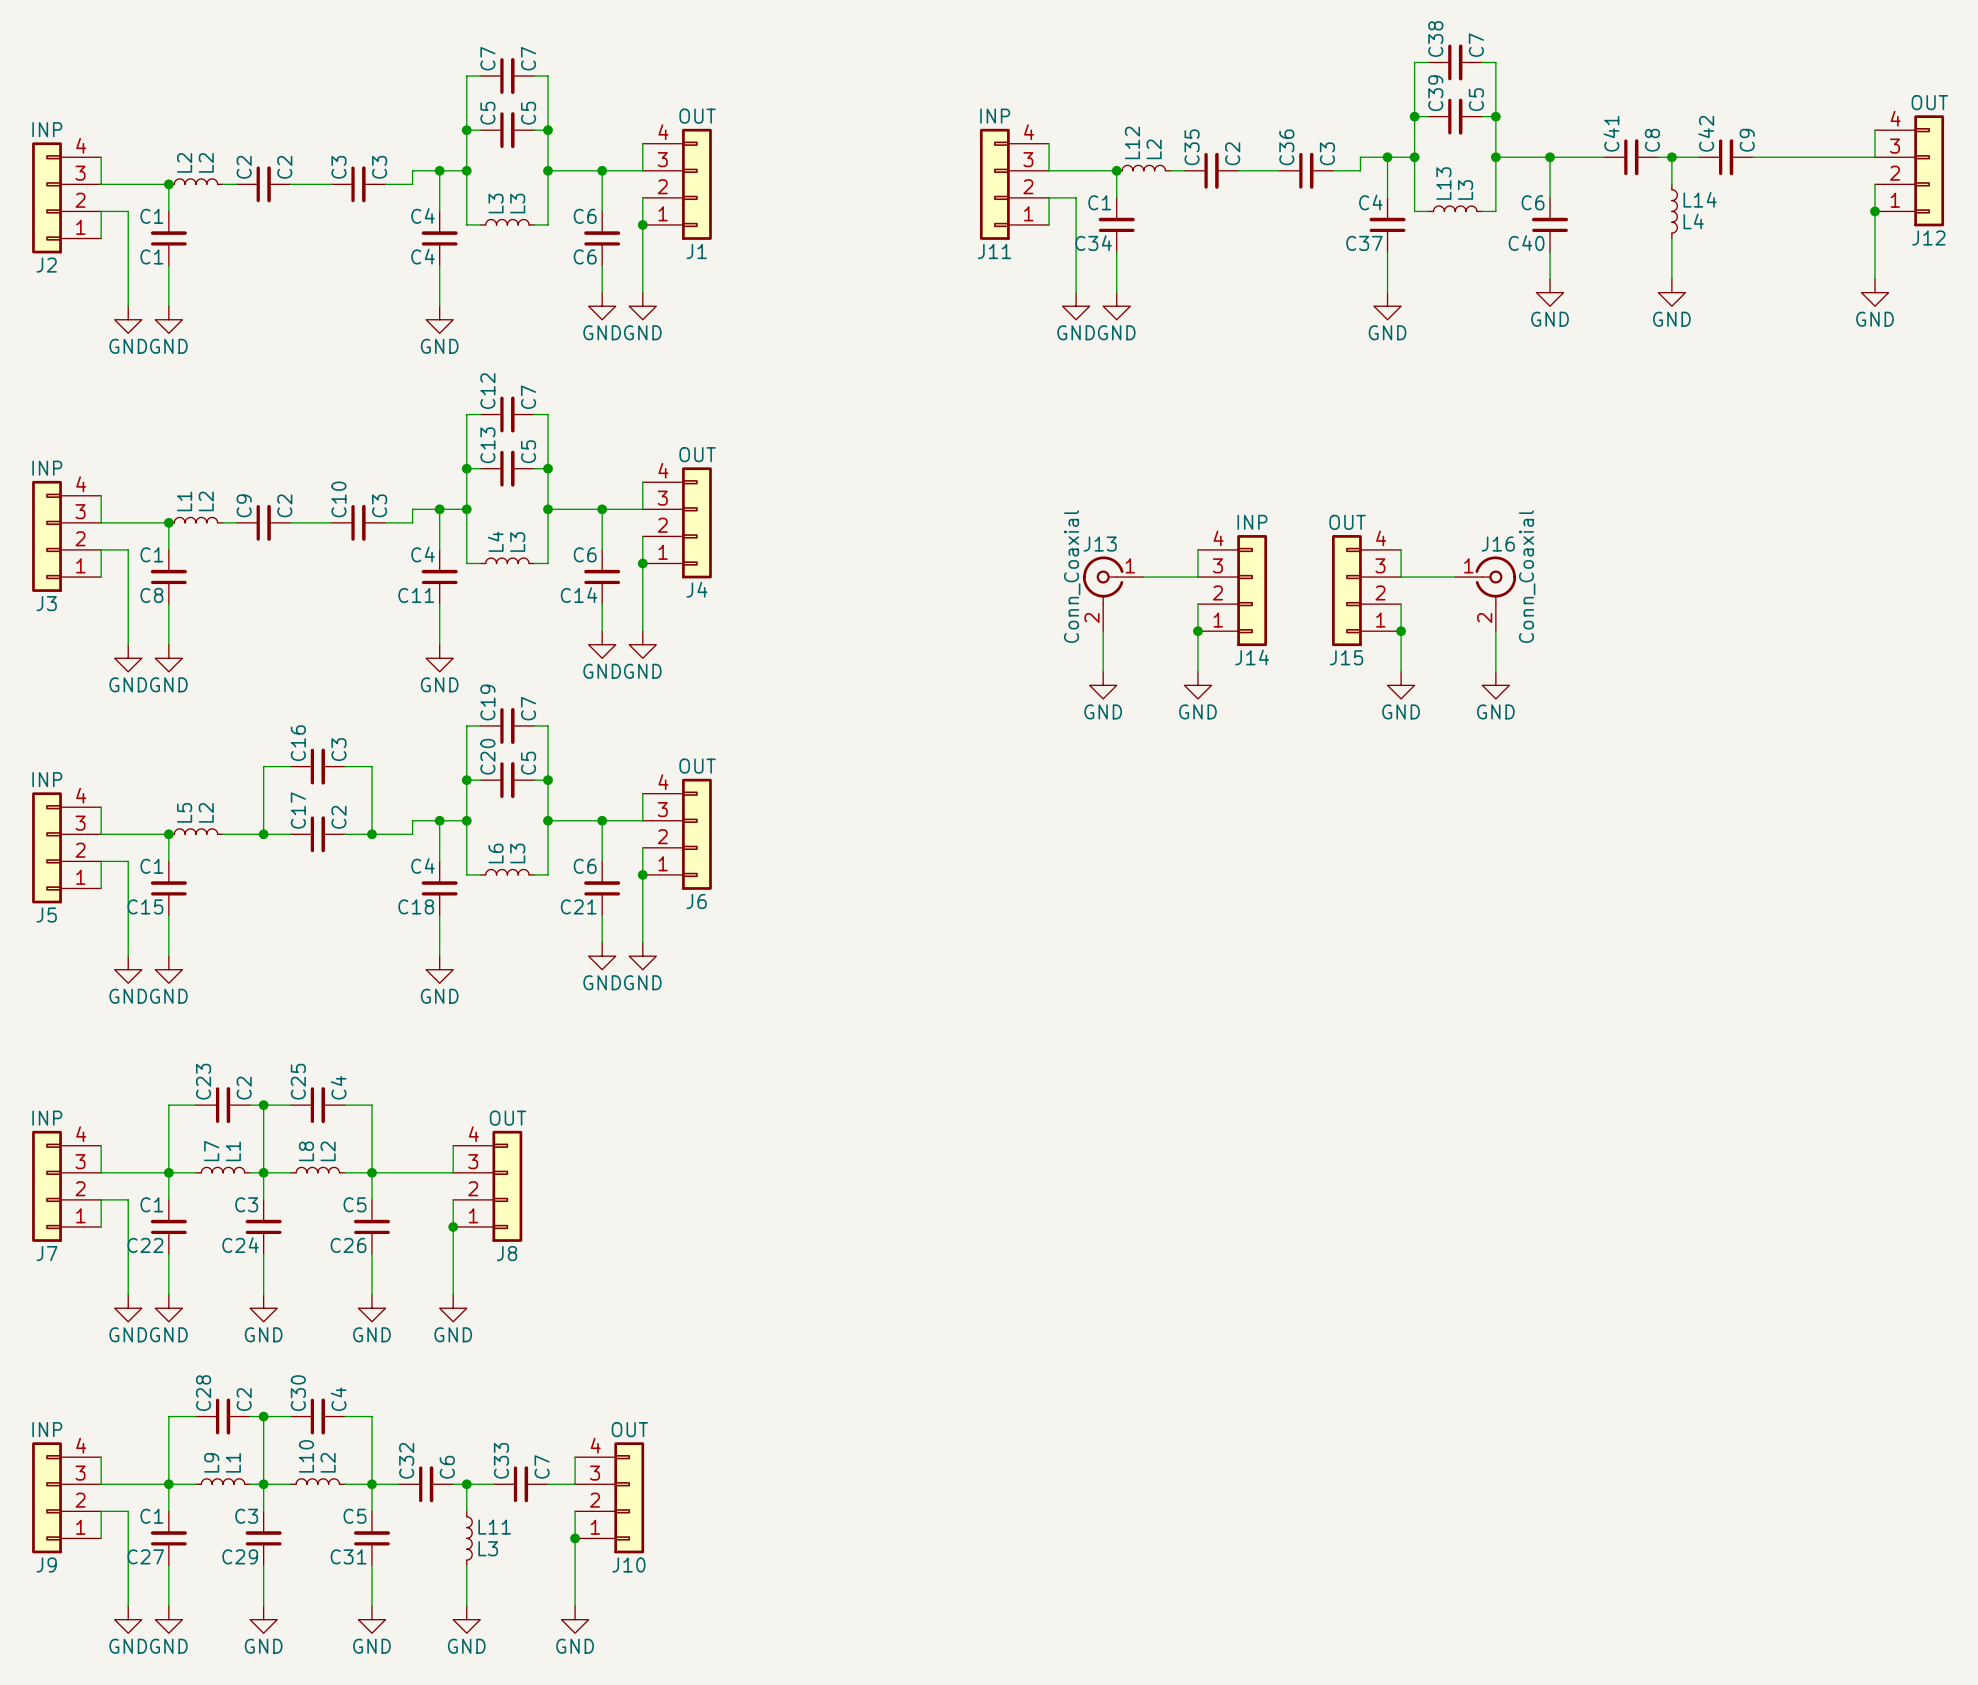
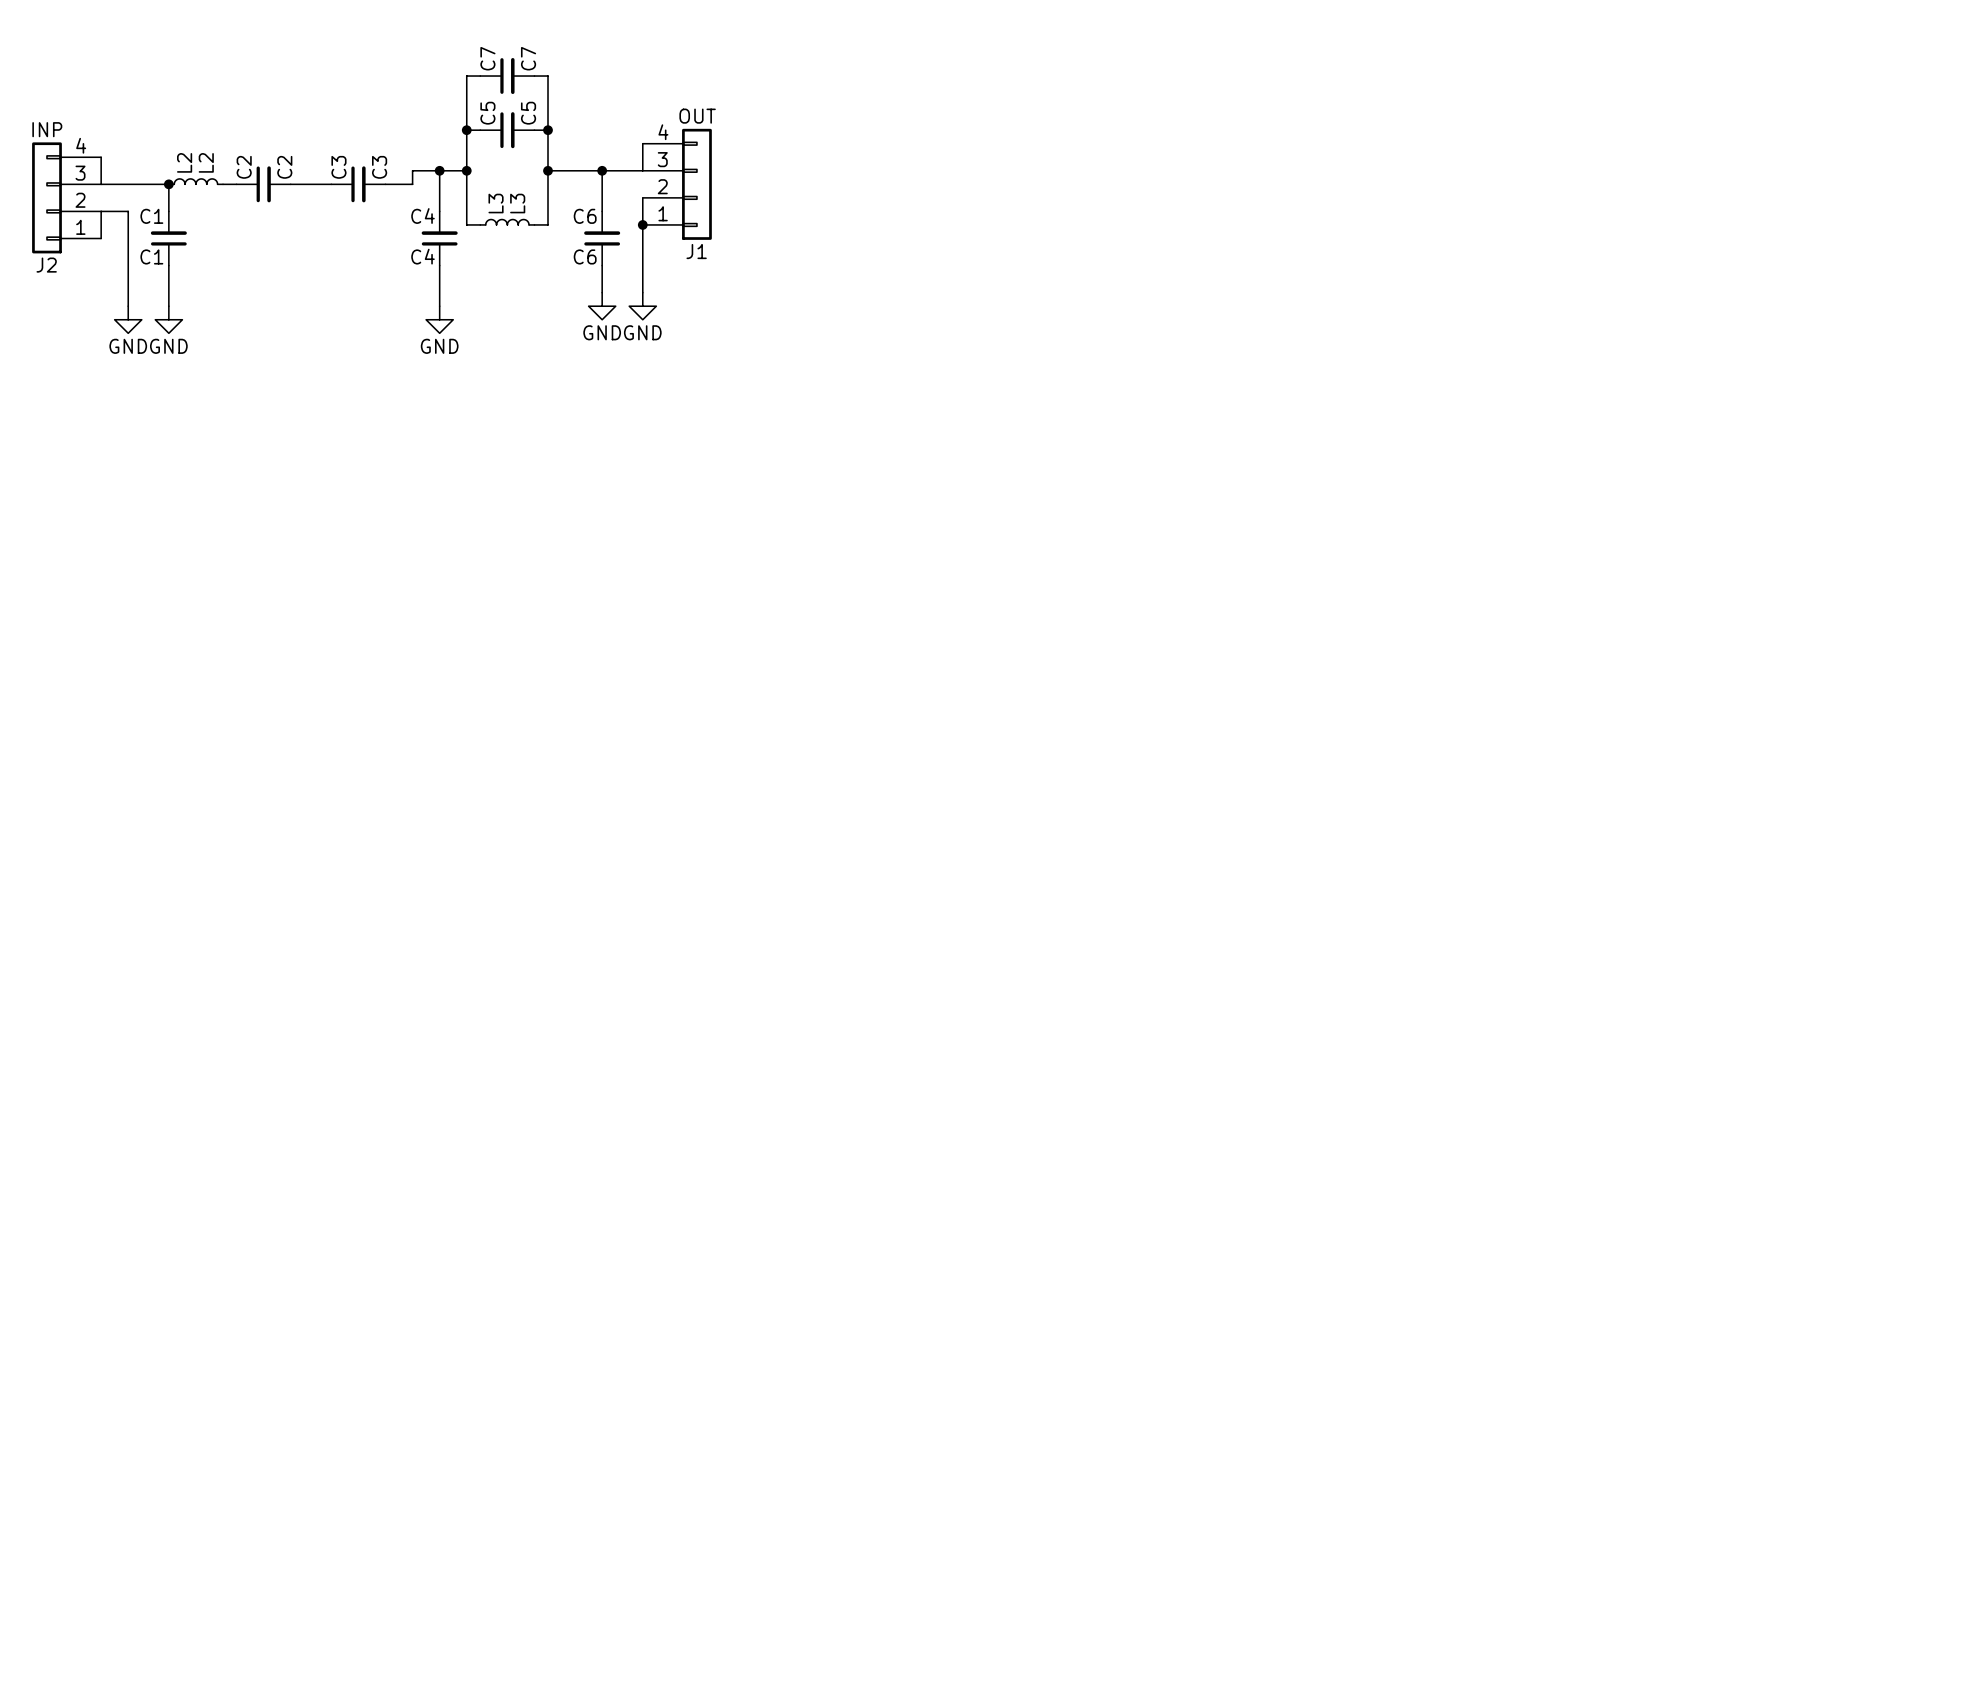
wire: (1428, 62) (1414, 62) (1414, 211) (1428, 211) -> none
C38: C7 (1455, 62) -> none
wire: (1482, 62) (1495, 62) (1495, 211) (1482, 211) -> none
wire: (1414, 116) (1428, 116) -> none
junction: (1414, 116) -> none
C39: C5 (1455, 116) -> none
wire: (1482, 116) (1495, 116) -> none
junction: (1495, 116) -> none
wire: (1875, 130) (1875, 157) (1753, 157) -> none
wire: (1049, 143) (1049, 170) (1116, 170) (1116, 197) -> none
wire: (1387, 157) (1387, 197) -> none
junction: (1387, 157) -> none
wire: (1414, 157) (1360, 157) (1360, 170) (1333, 170) -> none
junction: (1414, 157) -> none
wire: (1495, 157) (1604, 157) -> none
junction: (1495, 157) -> none
wire: (1550, 157) (1550, 197) -> none
junction: (1550, 157) -> none
C41: C8 (1631, 157) -> none
wire: (1658, 157) (1698, 157) -> none
wire: (1671, 157) (1671, 184) -> none
junction: (1671, 157) -> none
C42: C9 (1726, 157) -> none
L12: L2 (1143, 168) -> none
junction: (1116, 170) -> none
wire: (1170, 170) (1184, 170) -> none
C35: C2 (1211, 170) -> none
wire: (1238, 170) (1279, 170) -> none
C36: C3 (1306, 170) -> none
J12: OUT (1909, 170) -> none
J11: INP (1014, 184) -> none
wire: (1875, 184) (1875, 279) -> none
L13: L3 (1455, 208) -> none
L14: L4 (1674, 211) -> none
junction: (1875, 211) -> none
wire: (1049, 224) (1049, 197) (1076, 197) (1076, 292) -> none
C34: C1 (1116, 224) -> none
C37: C4 (1387, 224) -> none
C40: C6 (1550, 224) -> none
wire: (1671, 238) (1671, 279) -> none
wire: (1116, 252) (1116, 292) -> none
wire: (1387, 252) (1387, 292) -> none
wire: (1550, 252) (1550, 279) -> none
power symbol: GND (1550, 292) -> none
power symbol: GND (1671, 292) -> none
power symbol: GND (1875, 292) -> none
power symbol: GND (1076, 306) -> none
power symbol: GND (1116, 306) -> none
power symbol: GND (1387, 306) -> none
wire: (480, 414) (466, 414) (466, 563) (480, 563) -> none
C12: C7 (507, 414) -> none
wire: (534, 414) (548, 414) (548, 563) (534, 563) -> none
wire: (466, 468) (480, 468) -> none
junction: (466, 468) -> none
C13: C5 (507, 468) -> none
wire: (534, 468) (548, 468) -> none
junction: (548, 468) -> none
wire: (642, 482) (642, 509) (548, 509) -> none
wire: (101, 495) (101, 522) (168, 522) (168, 549) -> none
wire: (439, 509) (439, 549) -> none
junction: (439, 509) -> none
wire: (466, 509) (412, 509) (412, 522) (385, 522) -> none
junction: (466, 509) -> none
junction: (548, 509) -> none
wire: (602, 509) (602, 549) -> none
junction: (602, 509) -> none
L1: L2 (195, 520) -> none
junction: (168, 522) -> none
wire: (223, 522) (236, 522) -> none
C9: C2 (263, 522) -> none
wire: (290, 522) (331, 522) -> none
C10: C3 (358, 522) -> none
J4: OUT (677, 522) -> none
J3: INP (66, 536) -> none
wire: (642, 536) (642, 631) -> none
wire: (1197, 549) (1197, 577) (1143, 577) -> none
wire: (1401, 549) (1401, 577) (1455, 577) -> none
L4: L3 (507, 560) -> none
junction: (642, 563) -> none
wire: (101, 577) (101, 549) (128, 549) (128, 644) -> none
C8: C1 (168, 577) -> none
C11: C4 (439, 577) -> none
C14: C6 (602, 577) -> none
J14: INP (1232, 590) -> none
J15: OUT (1366, 590) -> none
J13: Conn_Coaxial (1113, 593) -> none
J16: Conn_Coaxial (1485, 593) -> none
wire: (168, 604) (168, 644) -> none
wire: (439, 604) (439, 644) -> none
wire: (602, 604) (602, 631) -> none
wire: (1197, 604) (1197, 671) -> none
wire: (1401, 604) (1401, 671) -> none
wire: (1103, 631) (1103, 671) -> none
junction: (1197, 631) -> none
junction: (1401, 631) -> none
wire: (1495, 631) (1495, 671) -> none
power symbol: GND (602, 644) -> none
power symbol: GND (642, 644) -> none
power symbol: GND (128, 658) -> none
power symbol: GND (168, 658) -> none
power symbol: GND (439, 658) -> none
power symbol: GND (1103, 685) -> none
power symbol: GND (1197, 685) -> none
power symbol: GND (1401, 685) -> none
power symbol: GND (1495, 685) -> none
wire: (480, 725) (466, 725) (466, 874) (480, 874) -> none
C19: C7 (507, 725) -> none
wire: (534, 725) (548, 725) (548, 874) (534, 874) -> none
wire: (290, 766) (263, 766) (263, 834) -> none
C16: C3 (317, 766) -> none
wire: (344, 766) (371, 766) (371, 834) -> none
wire: (466, 780) (480, 780) -> none
junction: (466, 780) -> none
C20: C5 (507, 780) -> none
wire: (534, 780) (548, 780) -> none
junction: (548, 780) -> none
wire: (642, 793) (642, 820) (548, 820) -> none
wire: (101, 807) (101, 834) (168, 834) (168, 861) -> none
wire: (439, 820) (439, 861) -> none
junction: (439, 820) -> none
wire: (466, 820) (412, 820) (412, 834) (344, 834) -> none
junction: (466, 820) -> none
junction: (548, 820) -> none
wire: (602, 820) (602, 861) -> none
junction: (602, 820) -> none
L5: L2 (195, 831) -> none
junction: (168, 834) -> none
wire: (223, 834) (290, 834) -> none
junction: (263, 834) -> none
C17: C2 (317, 834) -> none
junction: (371, 834) -> none
J6: OUT (677, 834) -> none
J5: INP (66, 847) -> none
wire: (642, 847) (642, 942) -> none
L6: L3 (507, 872) -> none
junction: (642, 874) -> none
wire: (101, 888) (101, 861) (128, 861) (128, 956) -> none
C15: C1 (168, 888) -> none
C18: C4 (439, 888) -> none
C21: C6 (602, 888) -> none
wire: (168, 915) (168, 956) -> none
wire: (439, 915) (439, 956) -> none
wire: (602, 915) (602, 942) -> none
power symbol: GND (602, 956) -> none
power symbol: GND (642, 956) -> none
power symbol: GND (128, 969) -> none
power symbol: GND (168, 969) -> none
power symbol: GND (439, 969) -> none
wire: (195, 1105) (168, 1105) (168, 1199) -> none
C23: C2 (223, 1105) -> none
wire: (250, 1105) (290, 1105) -> none
wire: (263, 1105) (263, 1199) -> none
junction: (263, 1105) -> none
C25: C4 (317, 1105) -> none
wire: (344, 1105) (371, 1105) (371, 1199) -> none
wire: (101, 1145) (101, 1172) (195, 1172) -> none
wire: (453, 1145) (453, 1172) (344, 1172) -> none
L7: L1 (223, 1170) -> none
L8: L2 (317, 1170) -> none
junction: (168, 1172) -> none
wire: (250, 1172) (290, 1172) -> none
junction: (263, 1172) -> none
junction: (371, 1172) -> none
J7: INP (66, 1186) -> none
J8: OUT (487, 1186) -> none
wire: (453, 1199) (453, 1294) -> none
wire: (101, 1226) (101, 1199) (128, 1199) (128, 1294) -> none
C22: C1 (168, 1226) -> none
C24: C3 (263, 1226) -> none
C26: C5 (371, 1226) -> none
junction: (453, 1226) -> none
wire: (168, 1254) (168, 1294) -> none
wire: (263, 1254) (263, 1294) -> none
wire: (371, 1254) (371, 1294) -> none
power symbol: GND (128, 1308) -> none
power symbol: GND (168, 1308) -> none
power symbol: GND (263, 1308) -> none
power symbol: GND (371, 1308) -> none
power symbol: GND (453, 1308) -> none
wire: (195, 1416) (168, 1416) (168, 1511) -> none
C28: C2 (223, 1416) -> none
wire: (250, 1416) (290, 1416) -> none
wire: (263, 1416) (263, 1511) -> none
junction: (263, 1416) -> none
C30: C4 (317, 1416) -> none
wire: (344, 1416) (371, 1416) (371, 1511) -> none
wire: (101, 1457) (101, 1484) (195, 1484) -> none
wire: (575, 1457) (575, 1484) (548, 1484) -> none
L9: L1 (223, 1481) -> none
L10: L2 (317, 1481) -> none
junction: (168, 1484) -> none
wire: (250, 1484) (290, 1484) -> none
junction: (263, 1484) -> none
wire: (344, 1484) (399, 1484) -> none
junction: (371, 1484) -> none
C32: C6 (426, 1484) -> none
wire: (453, 1484) (493, 1484) -> none
wire: (466, 1484) (466, 1511) -> none
junction: (466, 1484) -> none
C33: C7 (520, 1484) -> none
J9: INP (66, 1497) -> none
J10: OUT (609, 1497) -> none
wire: (575, 1511) (575, 1606) -> none
wire: (101, 1538) (101, 1511) (128, 1511) (128, 1606) -> none
C27: C1 (168, 1538) -> none
C29: C3 (263, 1538) -> none
C31: C5 (371, 1538) -> none
L11: L3 (469, 1538) -> none
junction: (575, 1538) -> none
wire: (168, 1565) (168, 1606) -> none
wire: (263, 1565) (263, 1606) -> none
wire: (371, 1565) (371, 1606) -> none
wire: (466, 1565) (466, 1606) -> none
power symbol: GND (128, 1619) -> none
power symbol: GND (168, 1619) -> none
power symbol: GND (263, 1619) -> none
power symbol: GND (371, 1619) -> none
power symbol: GND (466, 1619) -> none
power symbol: GND (575, 1619) -> none

